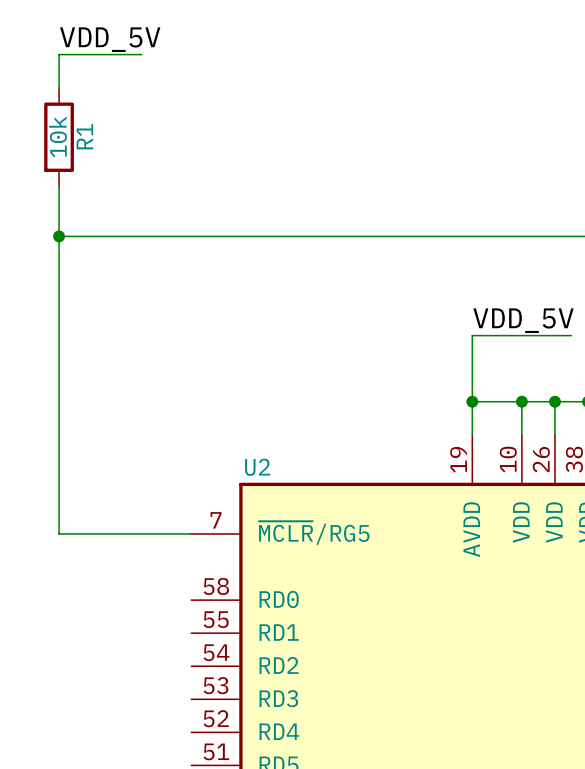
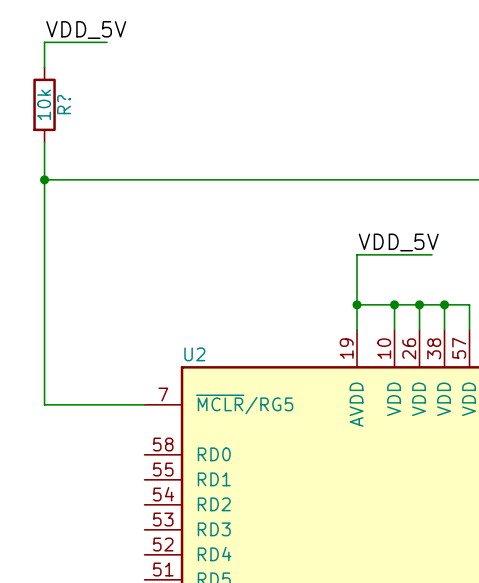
R1 name: R1 (84, 136) -> R? (64, 104)

